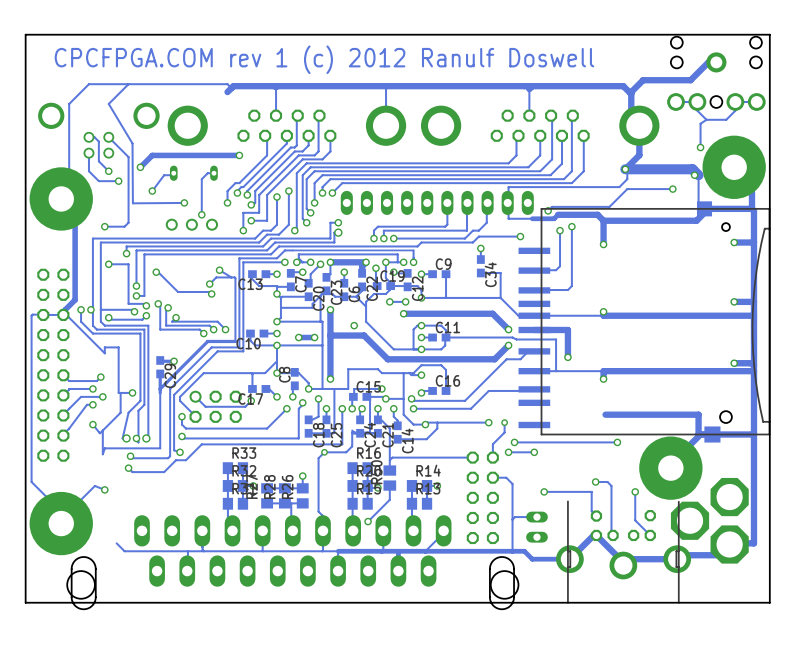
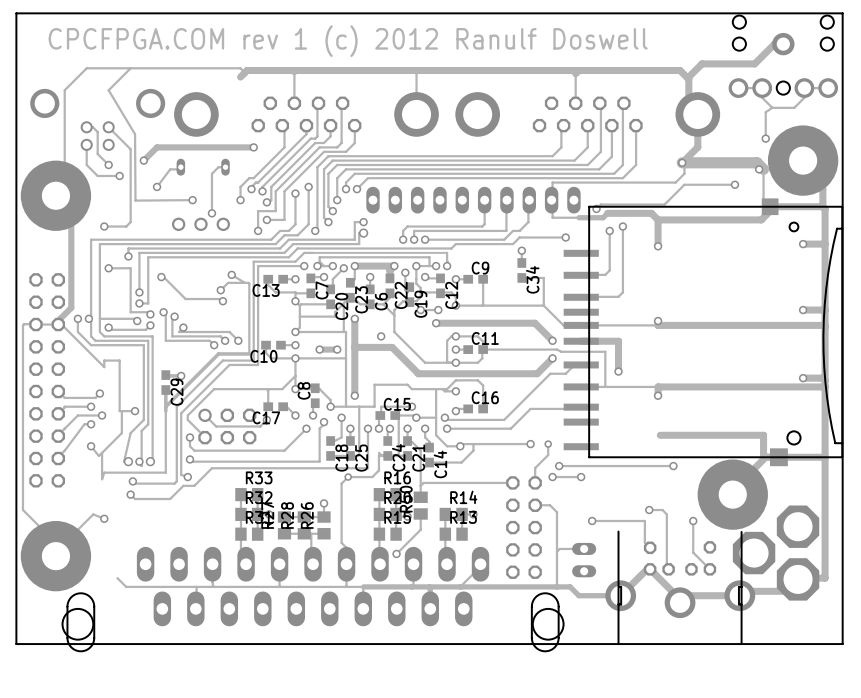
C19 rotation: 0° (383, 286) -> 90° clockwise (409, 294)

